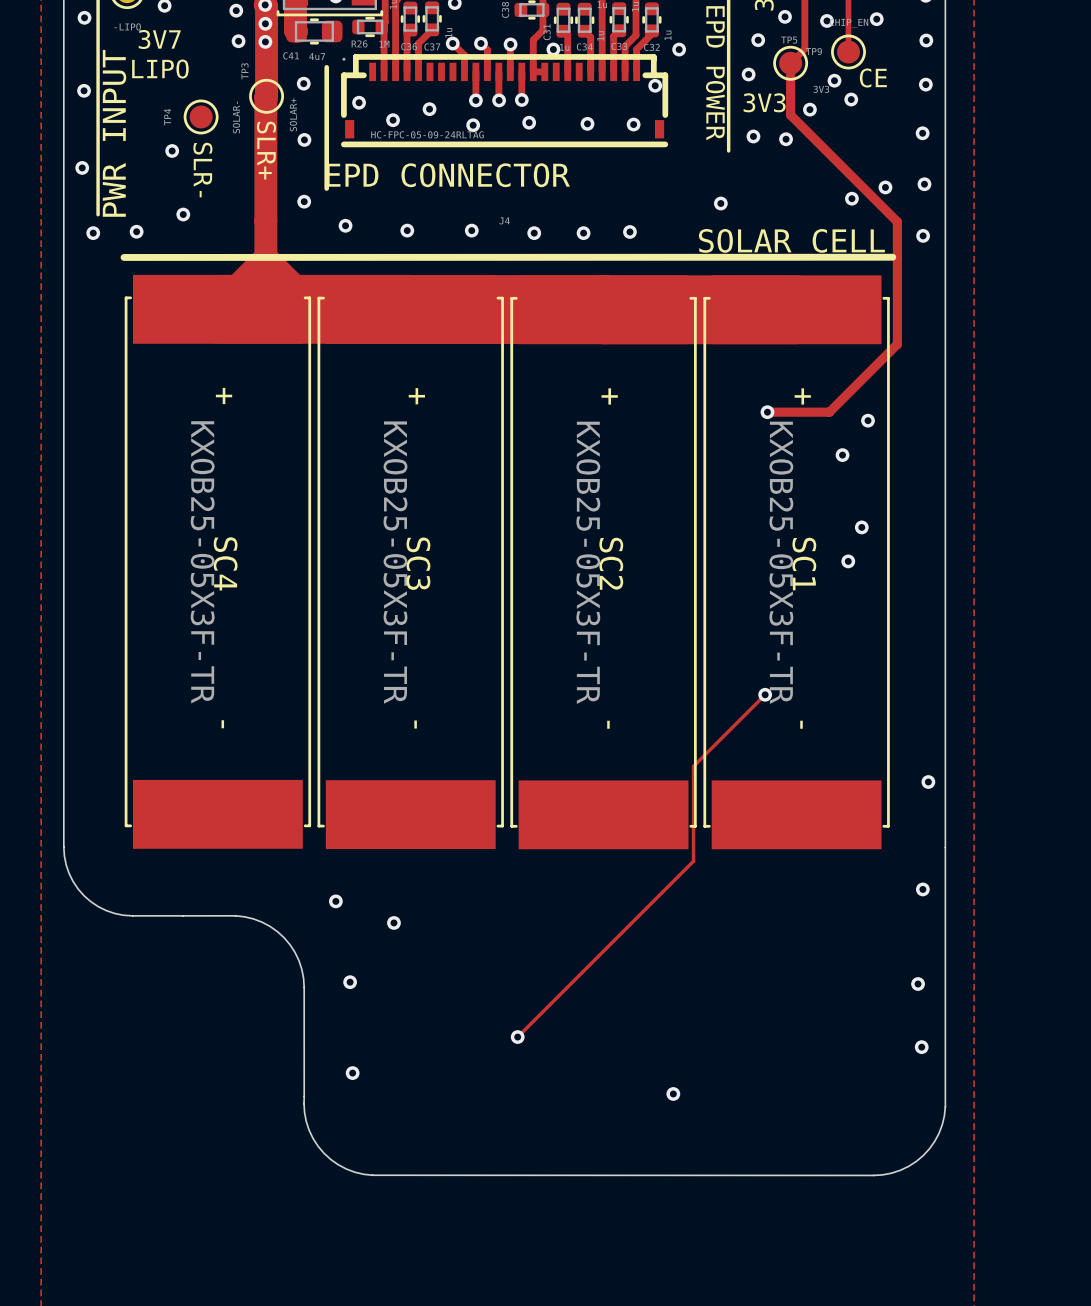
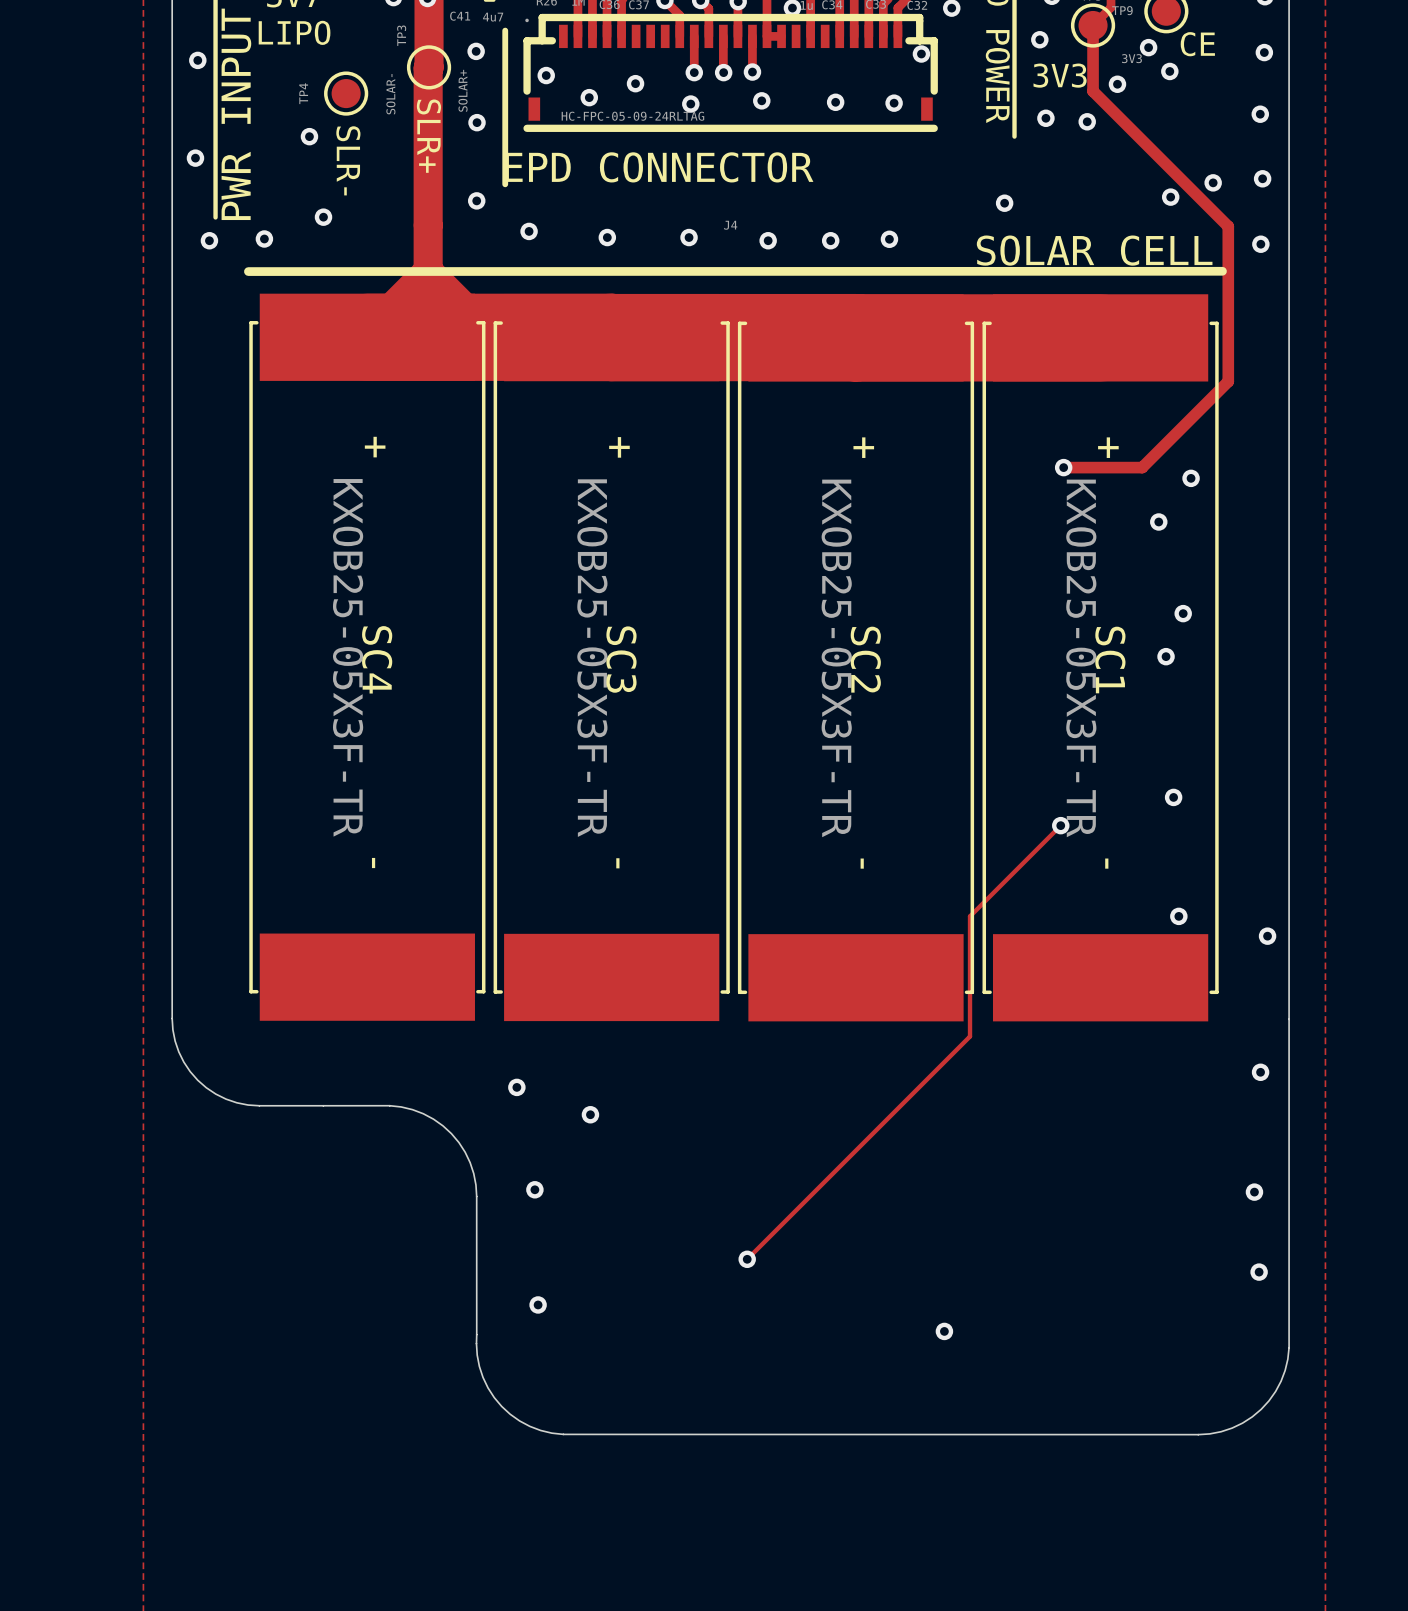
via: none -> (1173, 797)
via: none -> (1178, 916)

